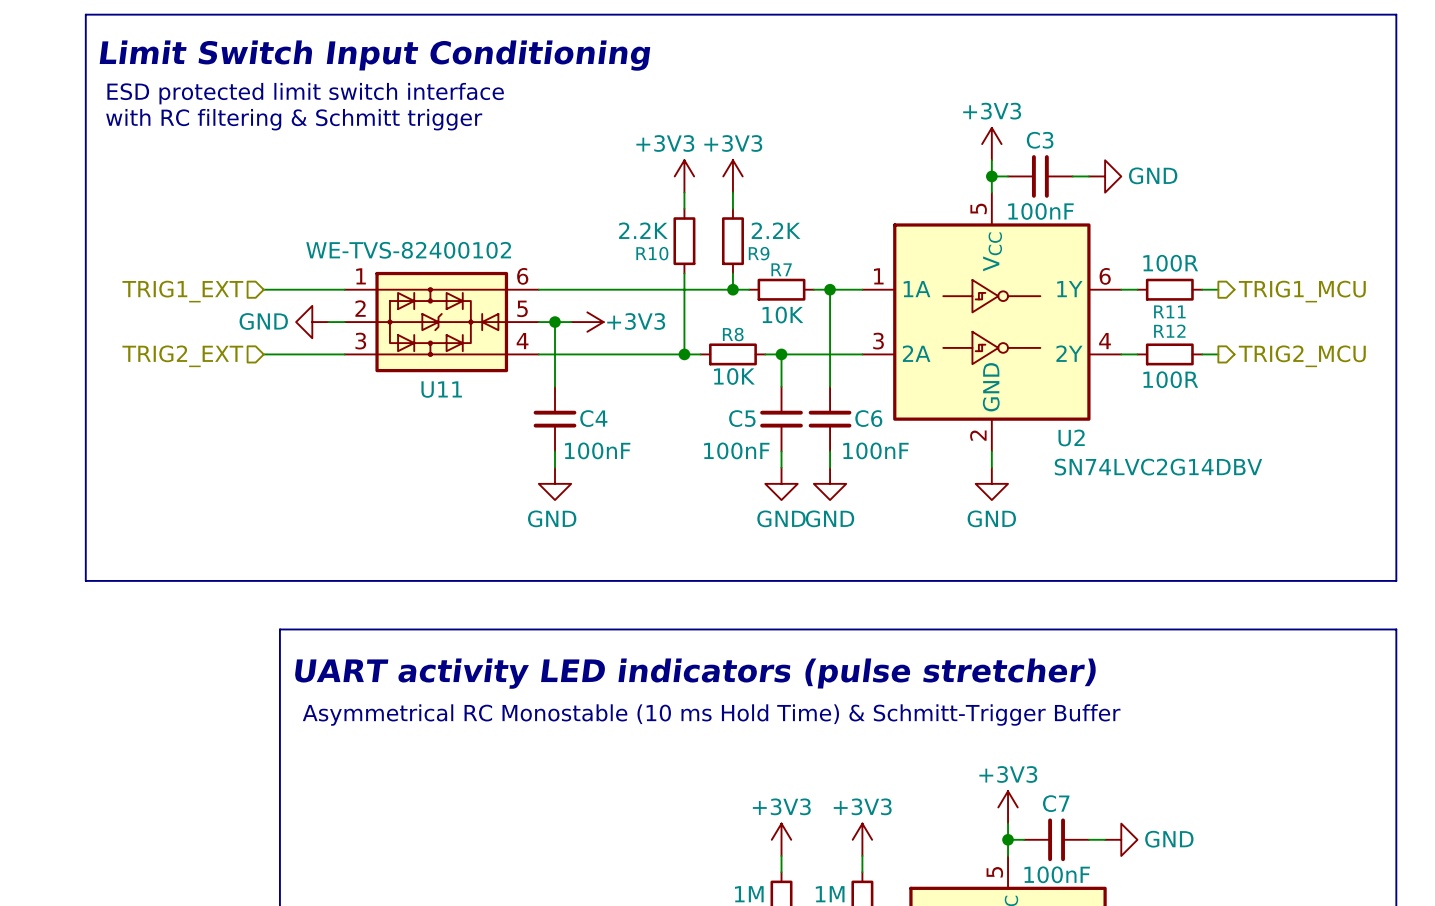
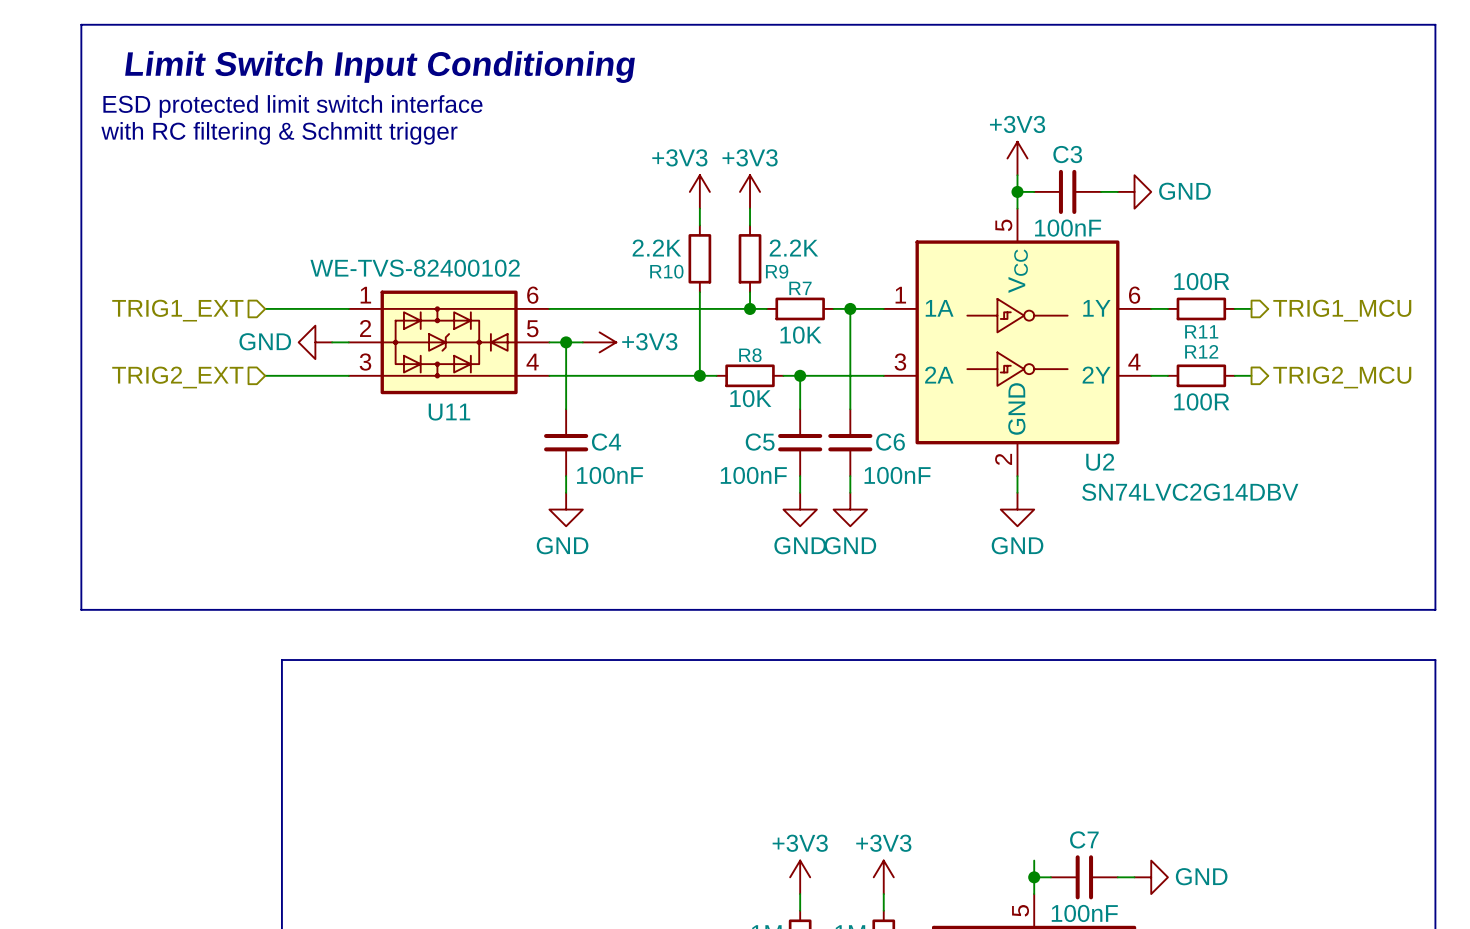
text: UART activity LED indicators (pulse stretcher) (695, 673) -> none
text: Asymmetrical RC Monostable (10 ms Hold Time) & Schmitt-Trigger Buffer (711, 715) -> none
power symbol: +3V3 (1008, 807) -> none

